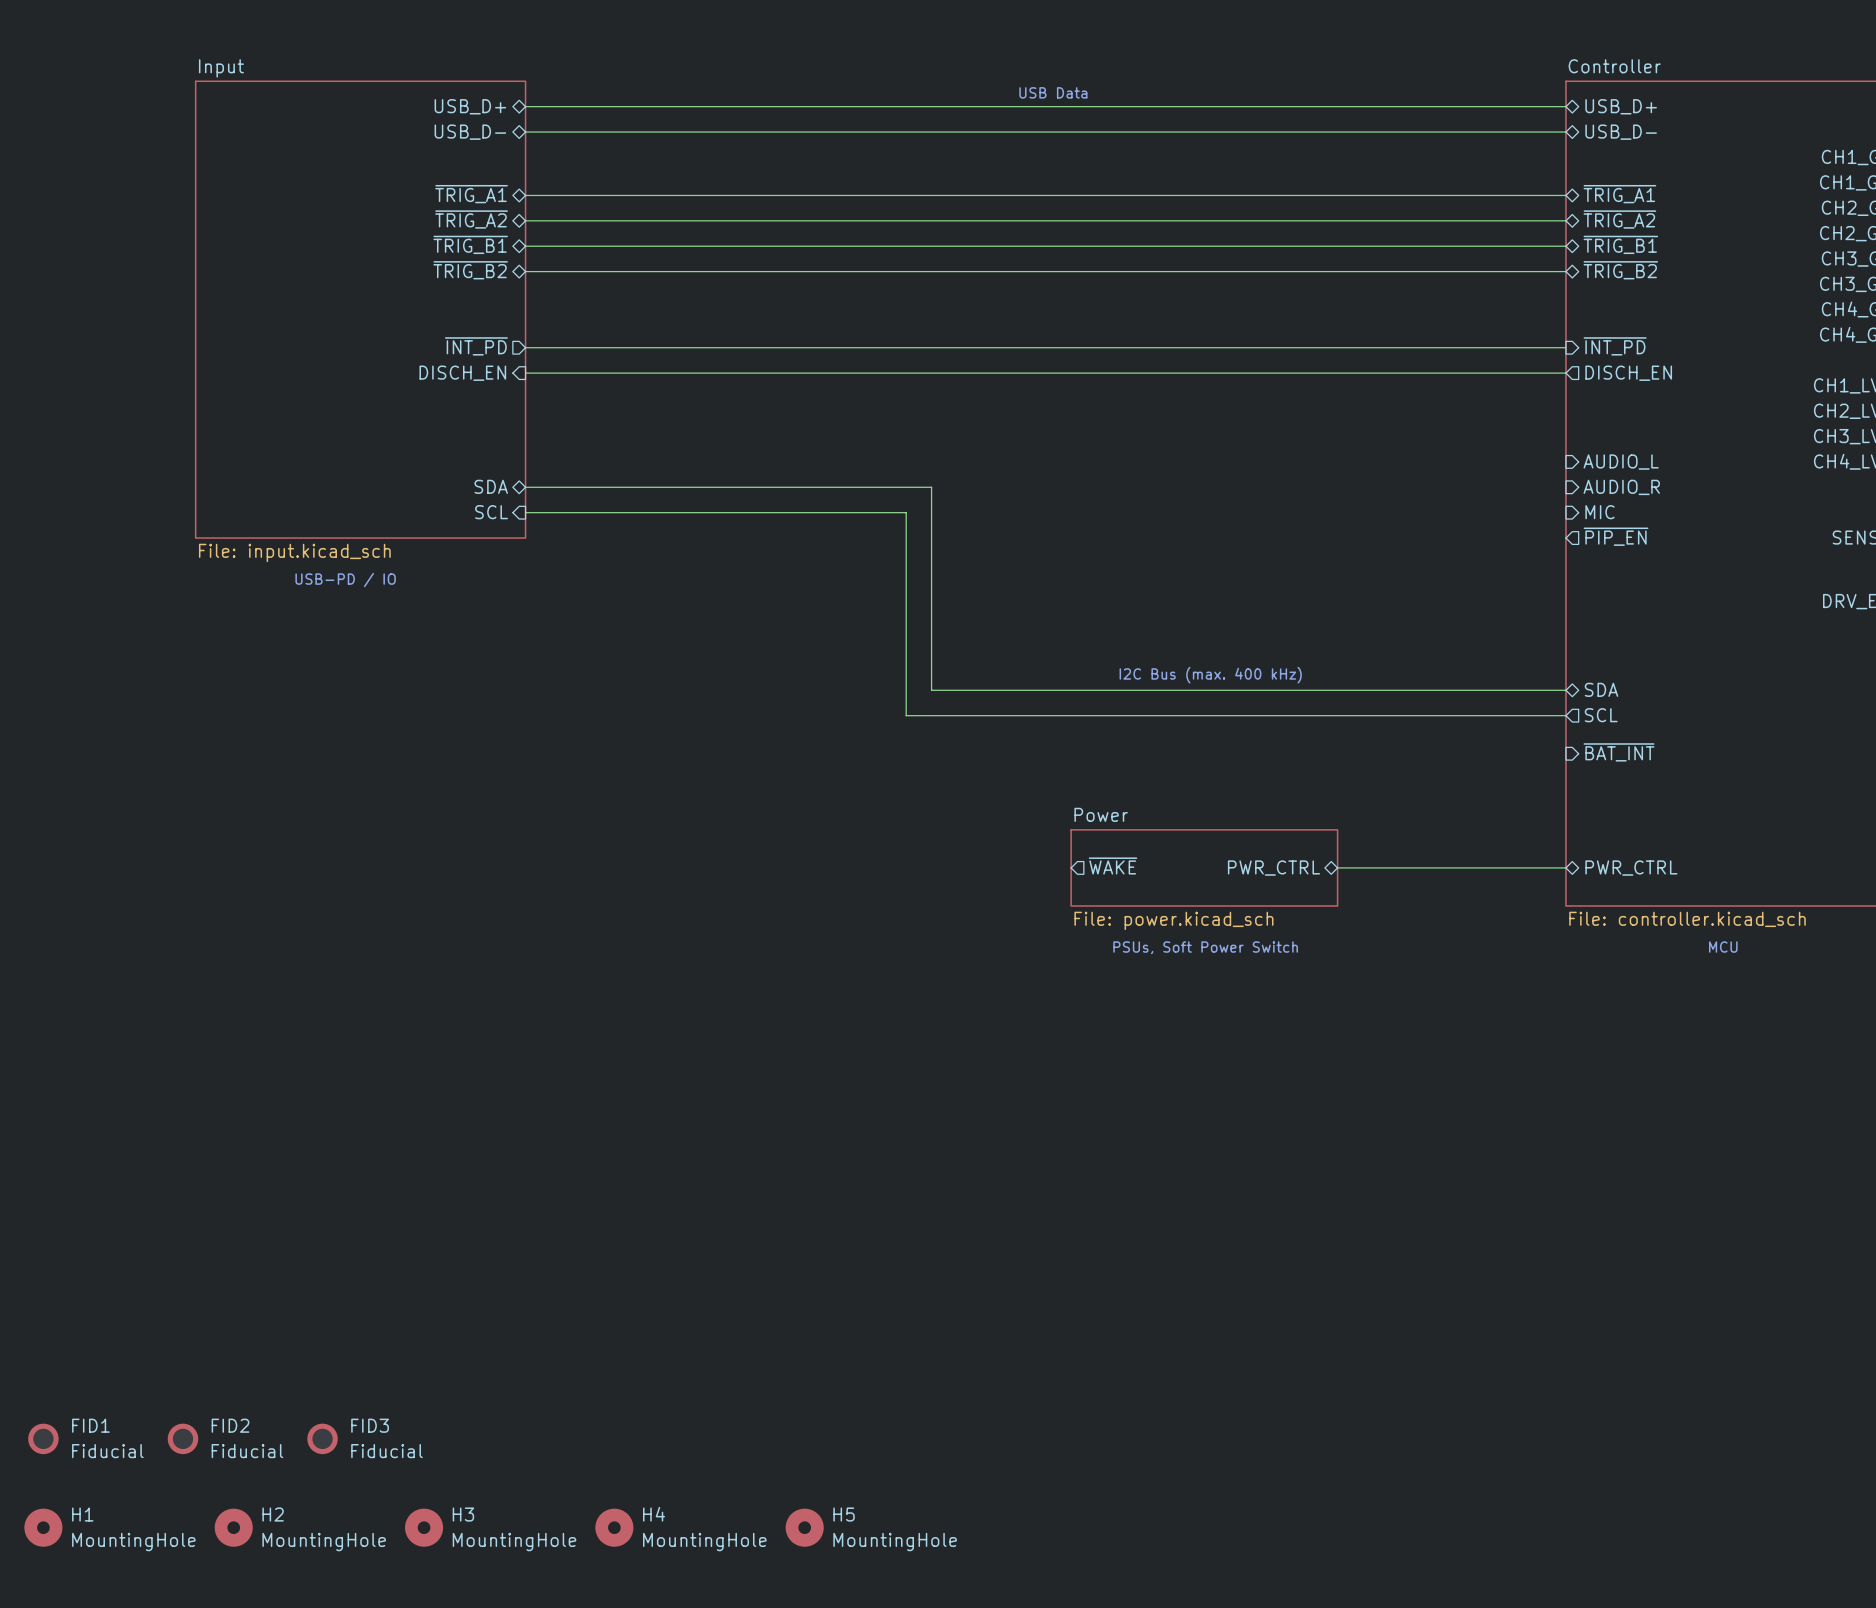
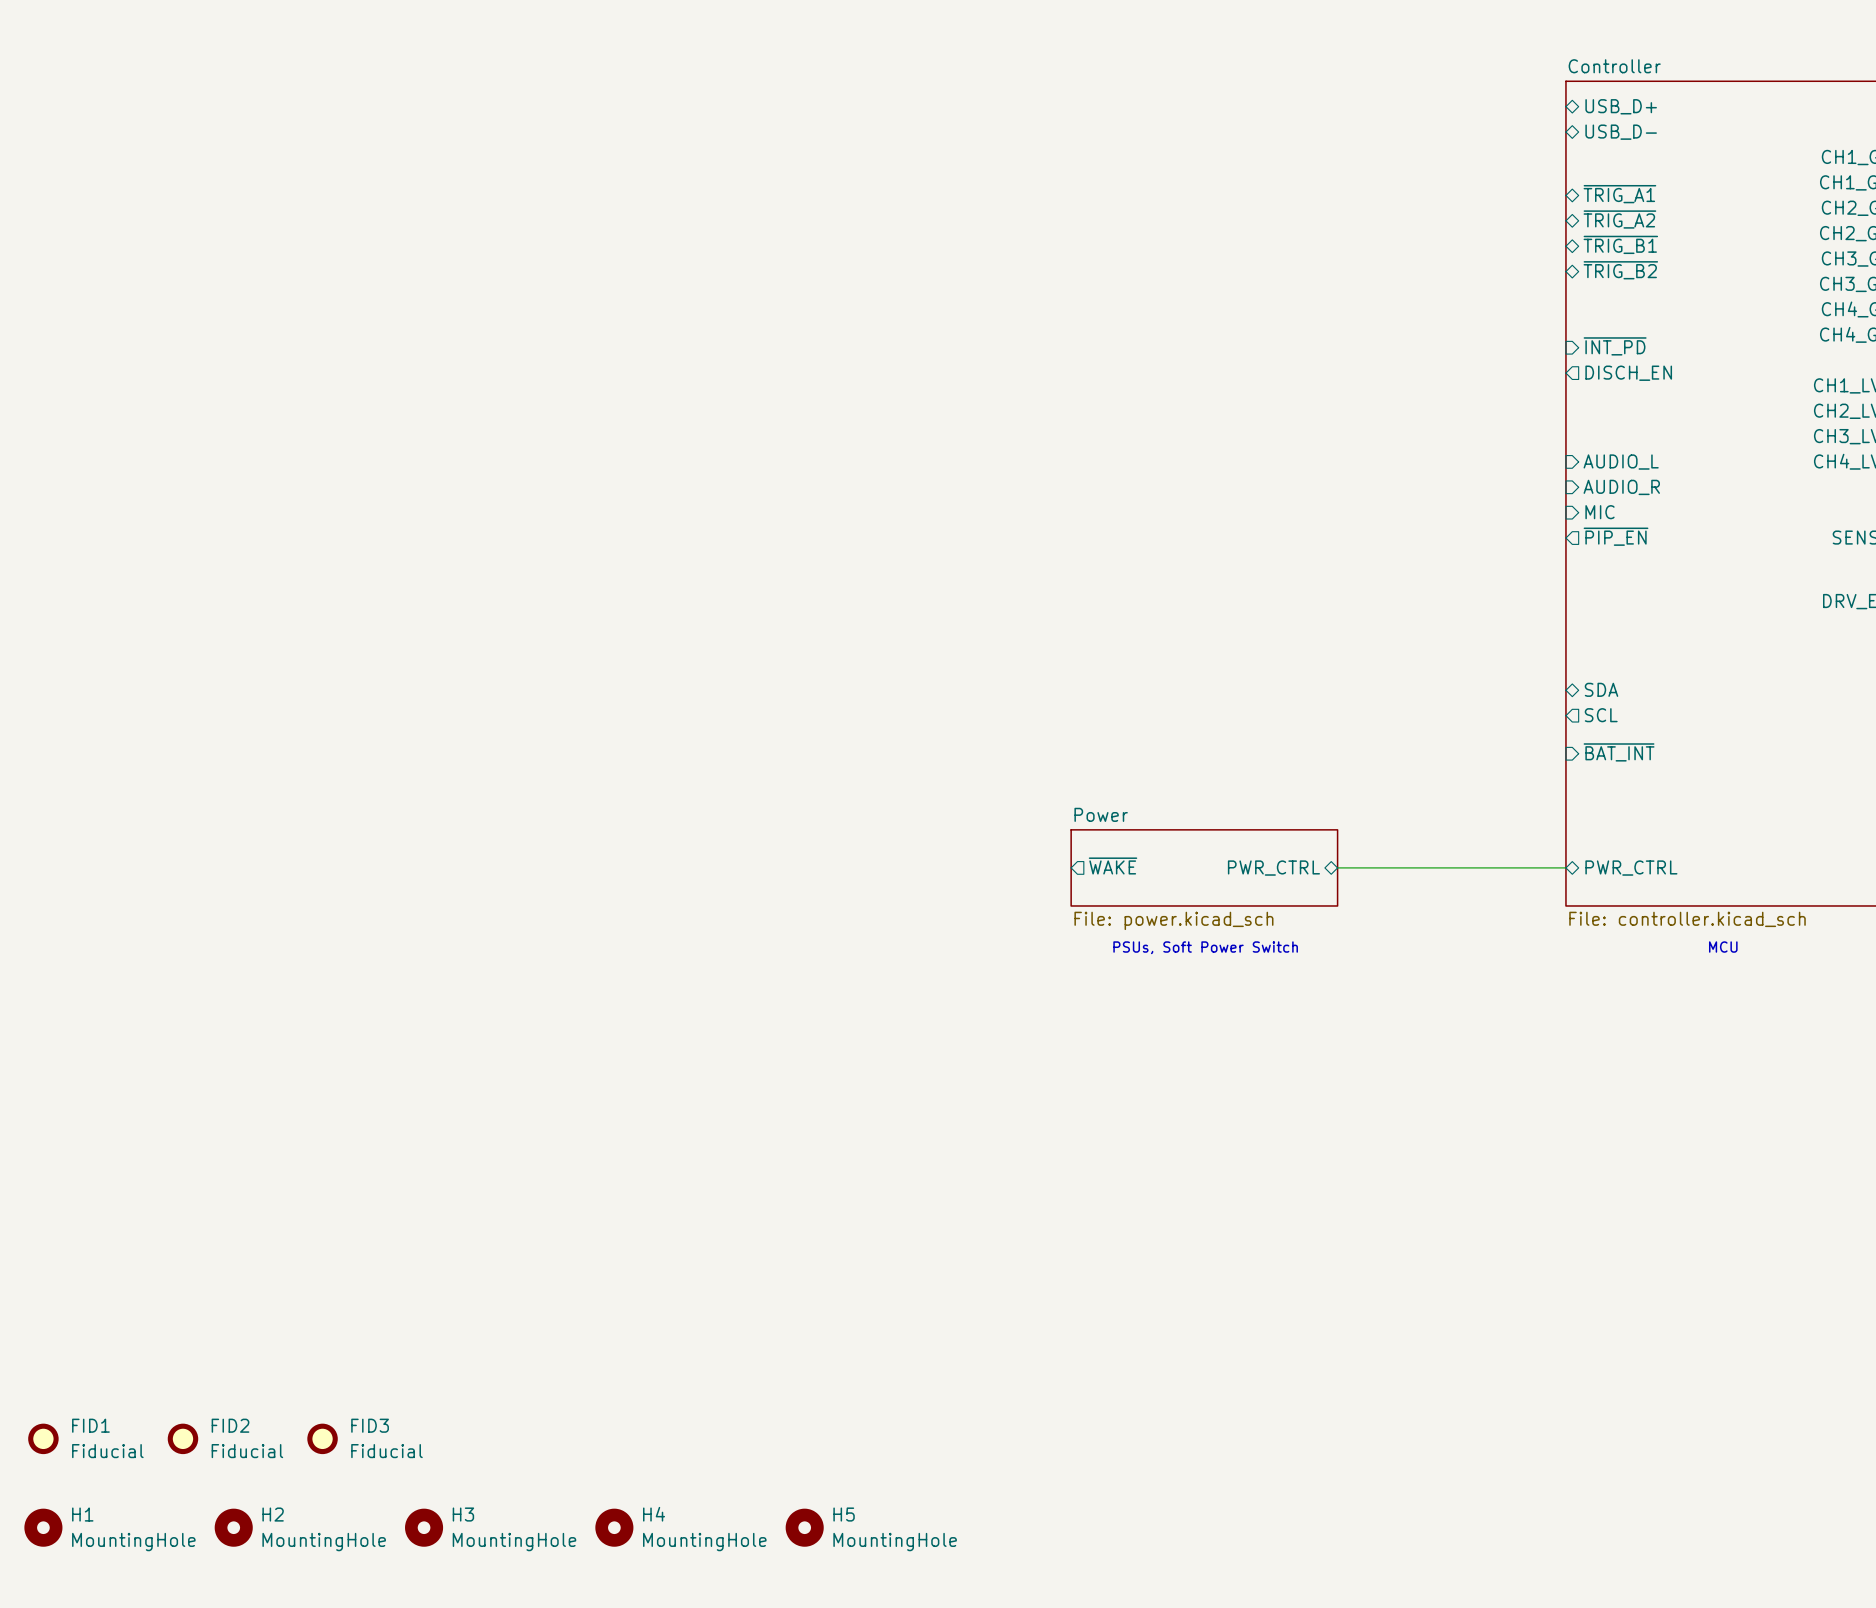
text: USB Data (1053, 92) -> none
sheet pin: USB_D+ (470, 106) -> none
wire: (525, 106) (1565, 106) -> none
sheet pin: USB_D- (470, 132) -> none
wire: (525, 132) (1565, 132) -> none
sheet pin: ~{TRIG_A1} (471, 194) -> none
wire: (525, 195) (1565, 195) -> none
sheet pin: ~{TRIG_A2} (471, 219) -> none
wire: (525, 220) (1565, 220) -> none
sheet pin: ~{TRIG_B1} (470, 244) -> none
wire: (525, 246) (1565, 246) -> none
sheet pin: ~{TRIG_B2} (470, 270) -> none
wire: (525, 271) (1565, 271) -> none
sheet Input: File: input.kicad_sch (360, 309) -> none
sheet pin: ~{INT_PD} (476, 346) -> none
wire: (525, 347) (1565, 347) -> none
sheet pin: DISCH_EN (462, 373) -> none
wire: (525, 373) (1565, 373) -> none
sheet pin: SDA (491, 486) -> none
wire: (525, 487) (931, 487) (931, 690) (1565, 690) -> none
sheet pin: SCL (491, 512) -> none
wire: (525, 512) (906, 512) (906, 715) (1565, 715) -> none
text: USB-PD / IO (345, 580) -> none
text: I2C Bus (max. 400 kHz) (1210, 675) -> none

